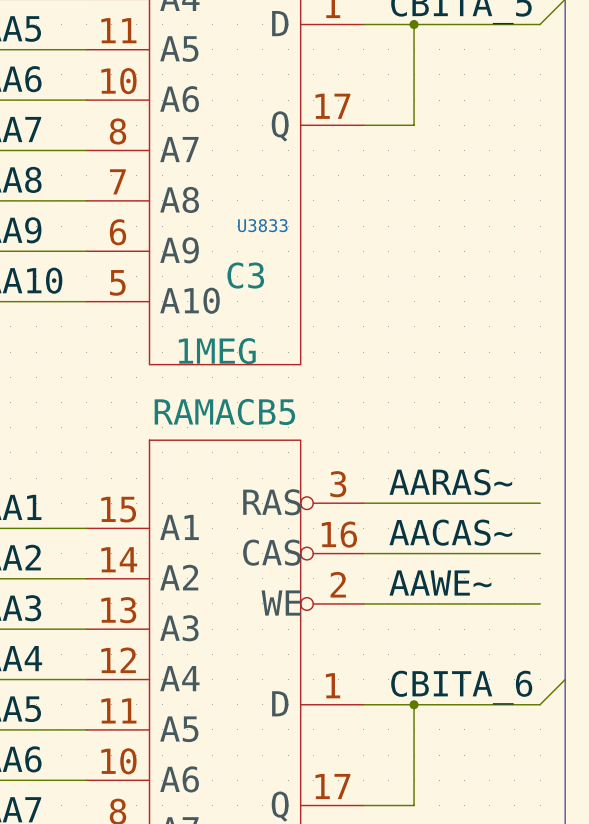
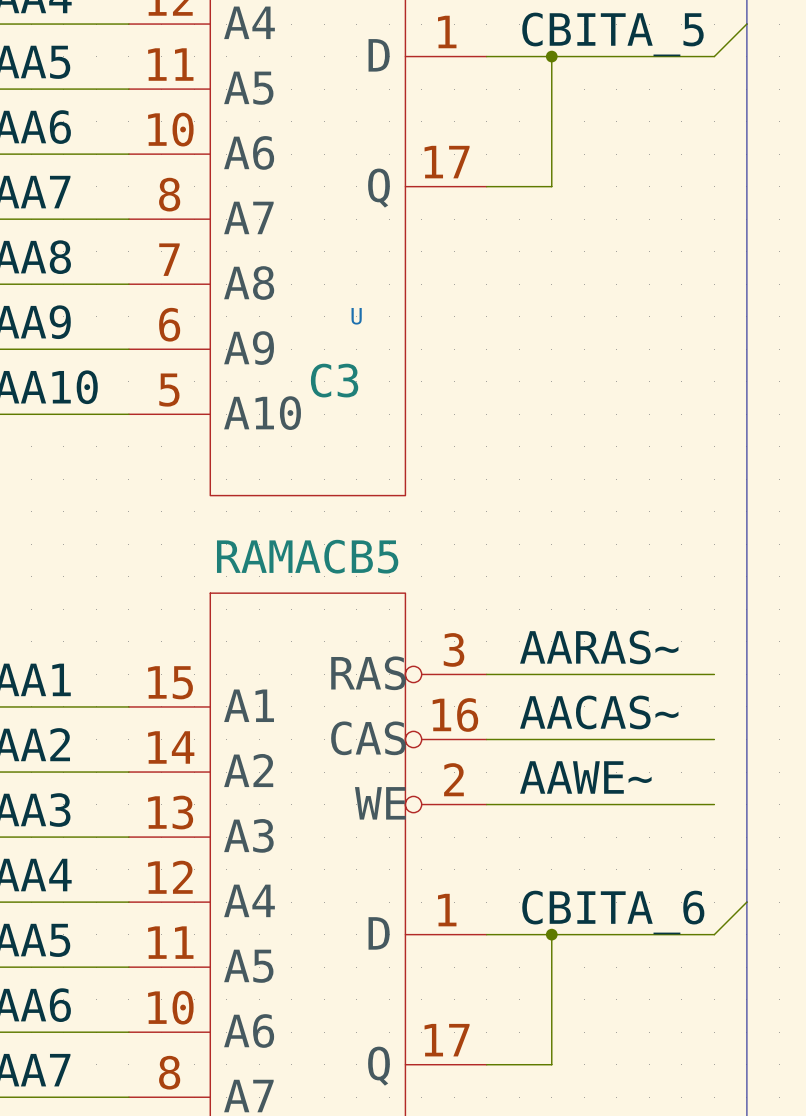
U3833 name: U3833 (262, 225) -> U (356, 316)
U3833 value: 1MEG (217, 351) -> none

